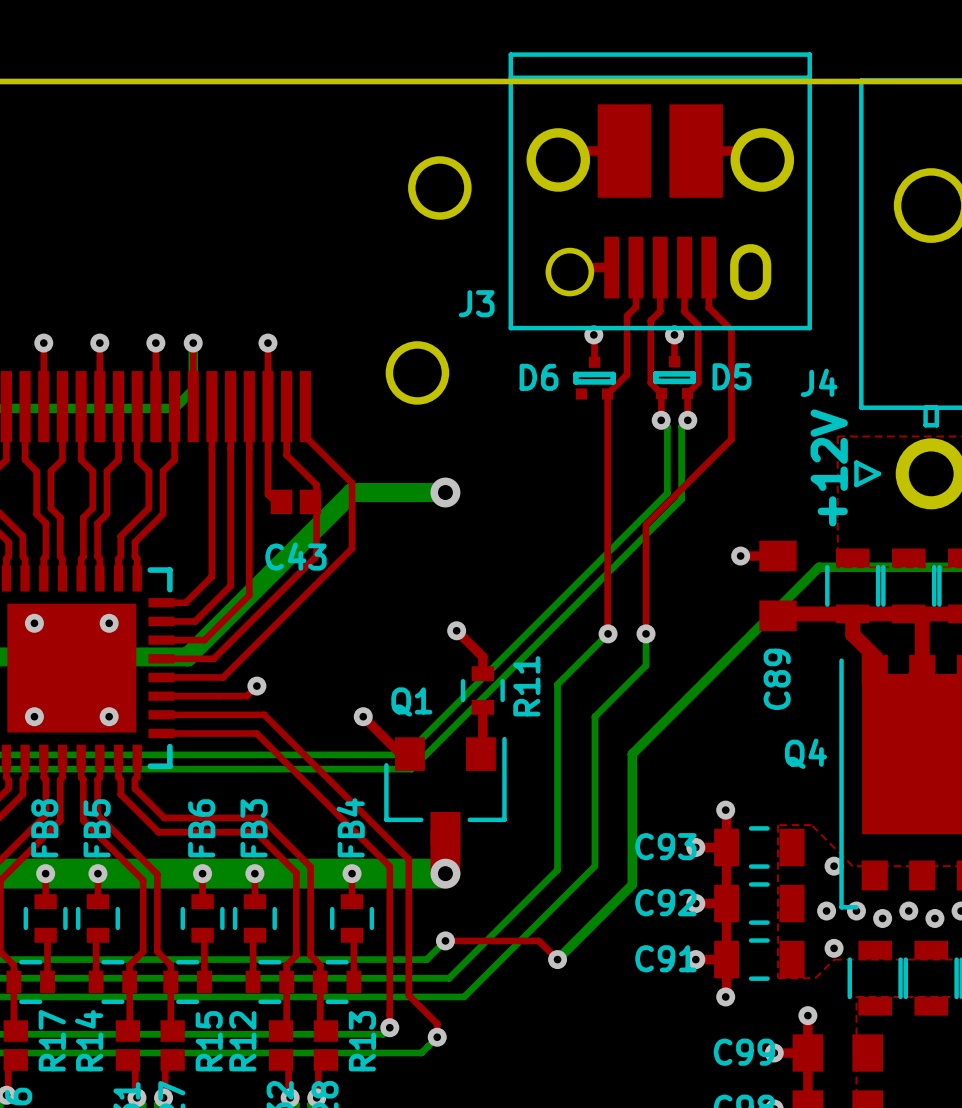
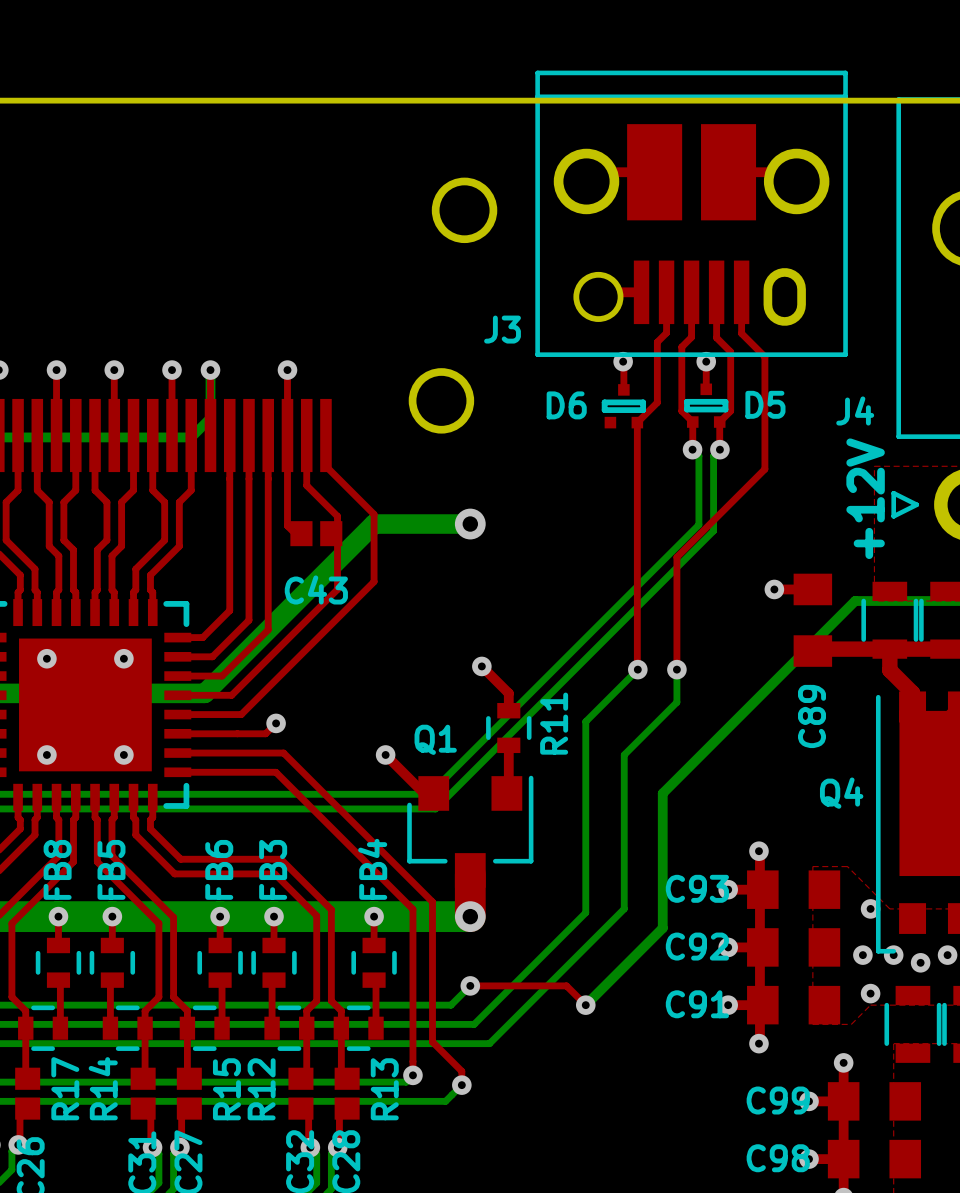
C93 footprint: [714, 826, 805, 869] -> [747, 870, 841, 909]
C92 footprint: [714, 882, 805, 925] -> [747, 928, 841, 967]
C91 footprint: [714, 938, 805, 981] -> [747, 985, 841, 1025]

